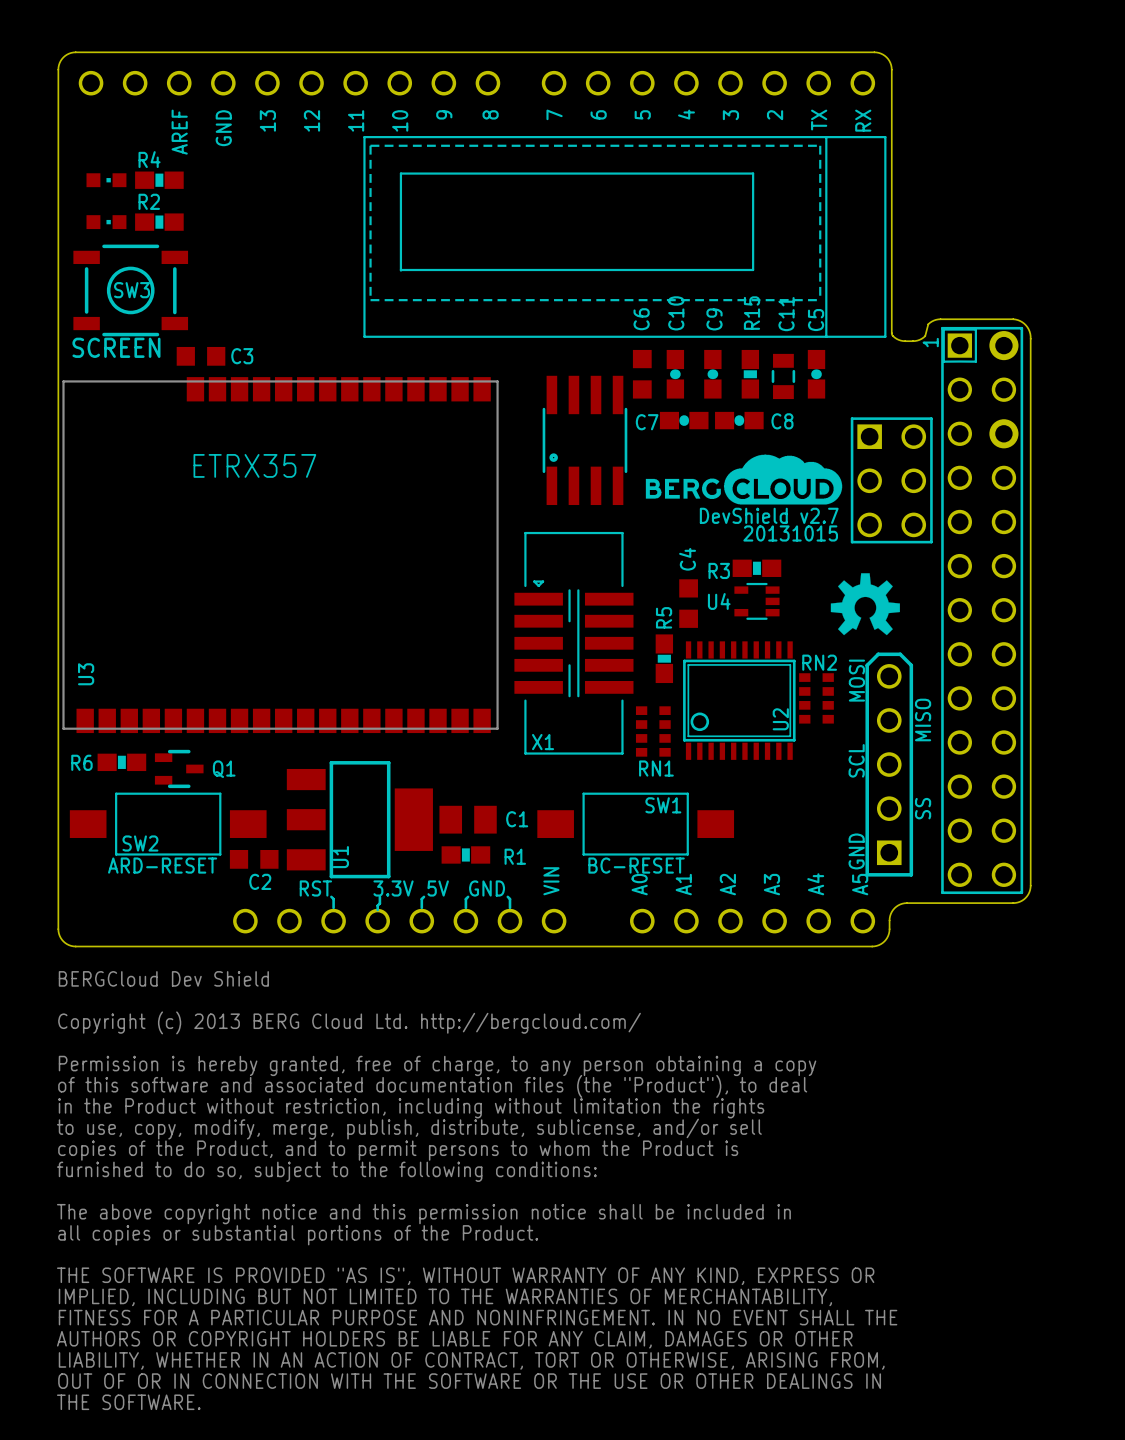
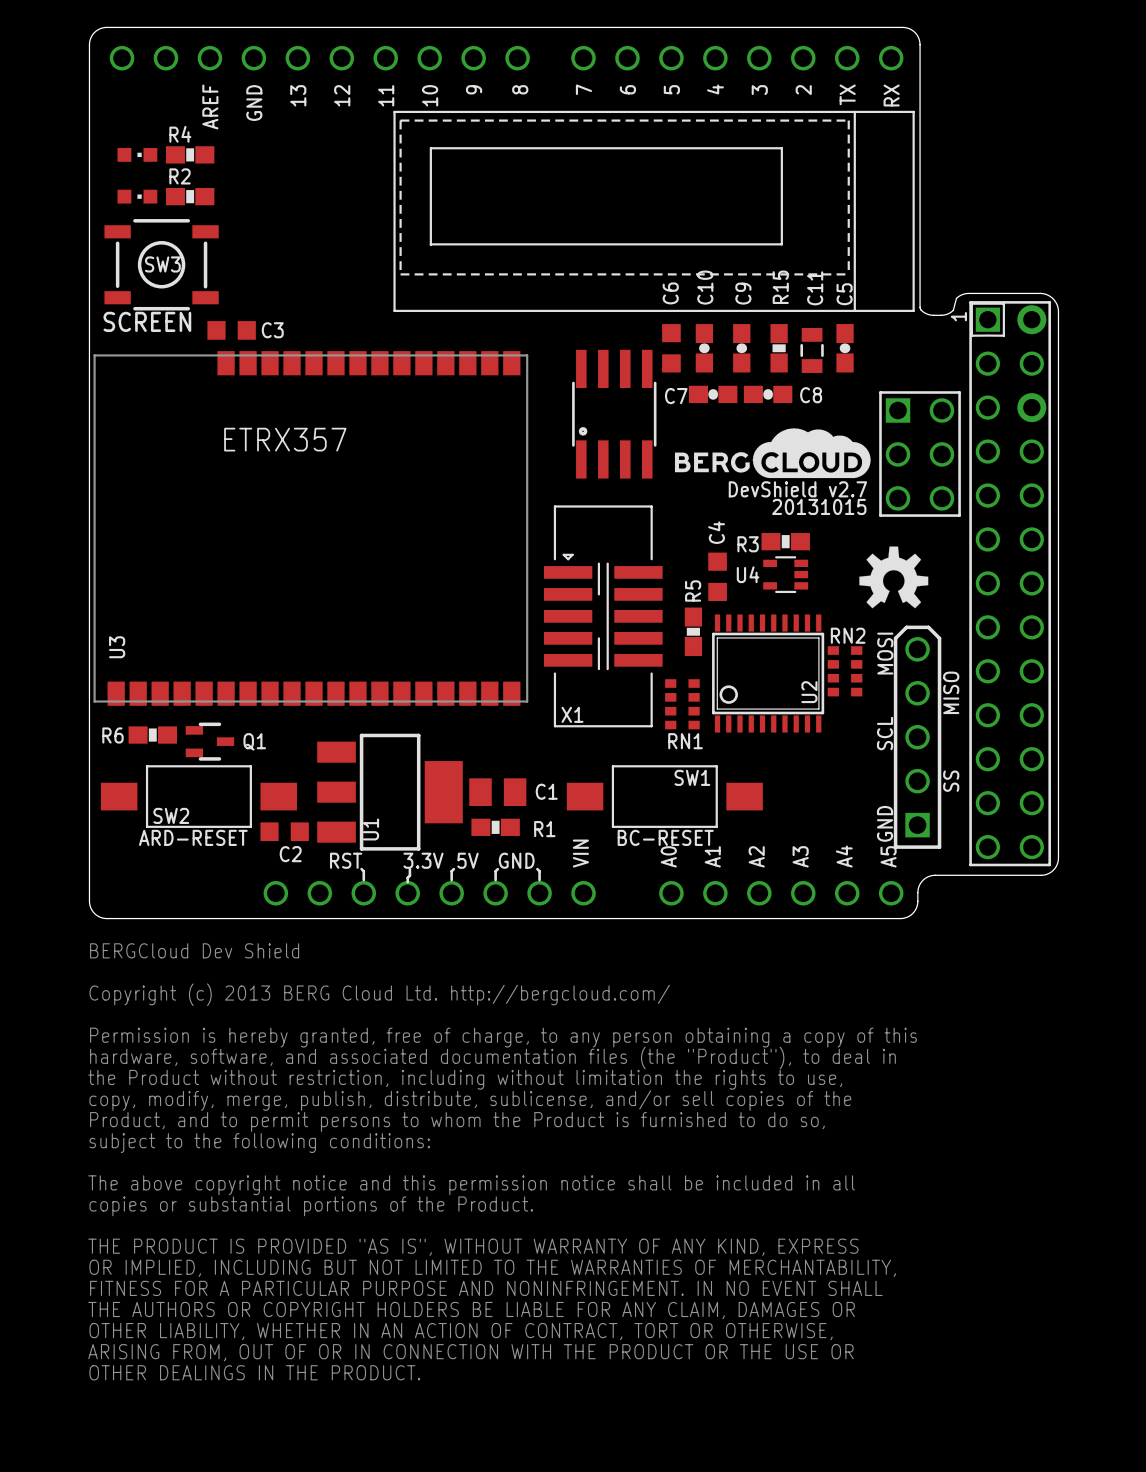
text: Permission is hereby granted, free of charge, to any person obtaining a copy (437, 1065) -> Permission is hereby granted, free of charge, to any person obtaining a copy of this (503, 1037)
text: of this software and associated documentation files (the "Product"), to deal (432, 1086) -> hardware, software, and associated documentation files (the "Product"), to deal in (492, 1058)
text: in the Product without restriction, including without limitation the rights (411, 1108) -> the Product without restriction, including without limitation the rights to use, (465, 1079)
text: to use, copy, modify, merge, publish, distribute, sublicense, and/or sell (409, 1129) -> copy, modify, merge, publish, distribute, sublicense, and/or sell copies of the (470, 1100)
text: copies of the Product, and to permit persons to whom the Product is (398, 1150) -> Product, and to permit persons to whom the Product is furnished to do so, (457, 1121)
text: furnished to do so, subject to the following conditions: (326, 1171) -> subject to the following conditions: (259, 1143)
text: The above copyright notice and this permission notice shall be included in (423, 1214) -> The above copyright notice and this permission notice shall be included in all (471, 1185)
text: all copies or substantial portions of the Product. (298, 1235) -> copies or substantial portions of the Product. (311, 1206)
text: THE SOFTWARE IS PROVIDED "AS IS", WITHOUT WARRANTY OF ANY KIND, EXPRESS OR (465, 1276) -> THE PRODUCT IS PROVIDED "AS IS", WITHOUT WARRANTY OF ANY KIND, EXPRESS (473, 1247)
text: IMPLIED, INCLUDING BUT NOT LIMITED TO THE WARRANTIES OF MERCHANTABILITY, (445, 1297) -> OR IMPLIED, INCLUDING BUT NOT LIMITED TO THE WARRANTIES OF MERCHANTABILITY, (492, 1268)
text: FITNESS FOR A PARTICULAR PURPOSE AND NONINFRINGEMENT. IN NO EVENT SHALL THE (478, 1317) -> FITNESS FOR A PARTICULAR PURPOSE AND NONINFRINGEMENT. IN NO EVENT SHALL (486, 1288)
text: AUTHORS OR COPYRIGHT HOLDERS BE LIABLE FOR ANY CLAIM, DAMAGES OR OTHER (454, 1339) -> THE AUTHORS OR COPYRIGHT HOLDERS BE LIABLE FOR ANY CLAIM, DAMAGES OR (471, 1310)
text: LIABILITY, WHETHER IN AN ACTION OF CONTRACT, TORT OR OTHERWISE, ARISING FROM, (471, 1360) -> OTHER LIABILITY, WHETHER IN AN ACTION OF CONTRACT, TORT OR OTHERWISE, (461, 1331)
text: OUT OF OR IN CONNECTION WITH THE SOFTWARE OR THE USE OR OTHER DEALINGS IN (469, 1381) -> ARISING FROM, OUT OF OR IN CONNECTION WITH THE PRODUCT OR THE USE OR (470, 1352)
text: THE SOFTWARE. (128, 1402) -> OTHER DEALINGS IN THE PRODUCT. (254, 1372)

